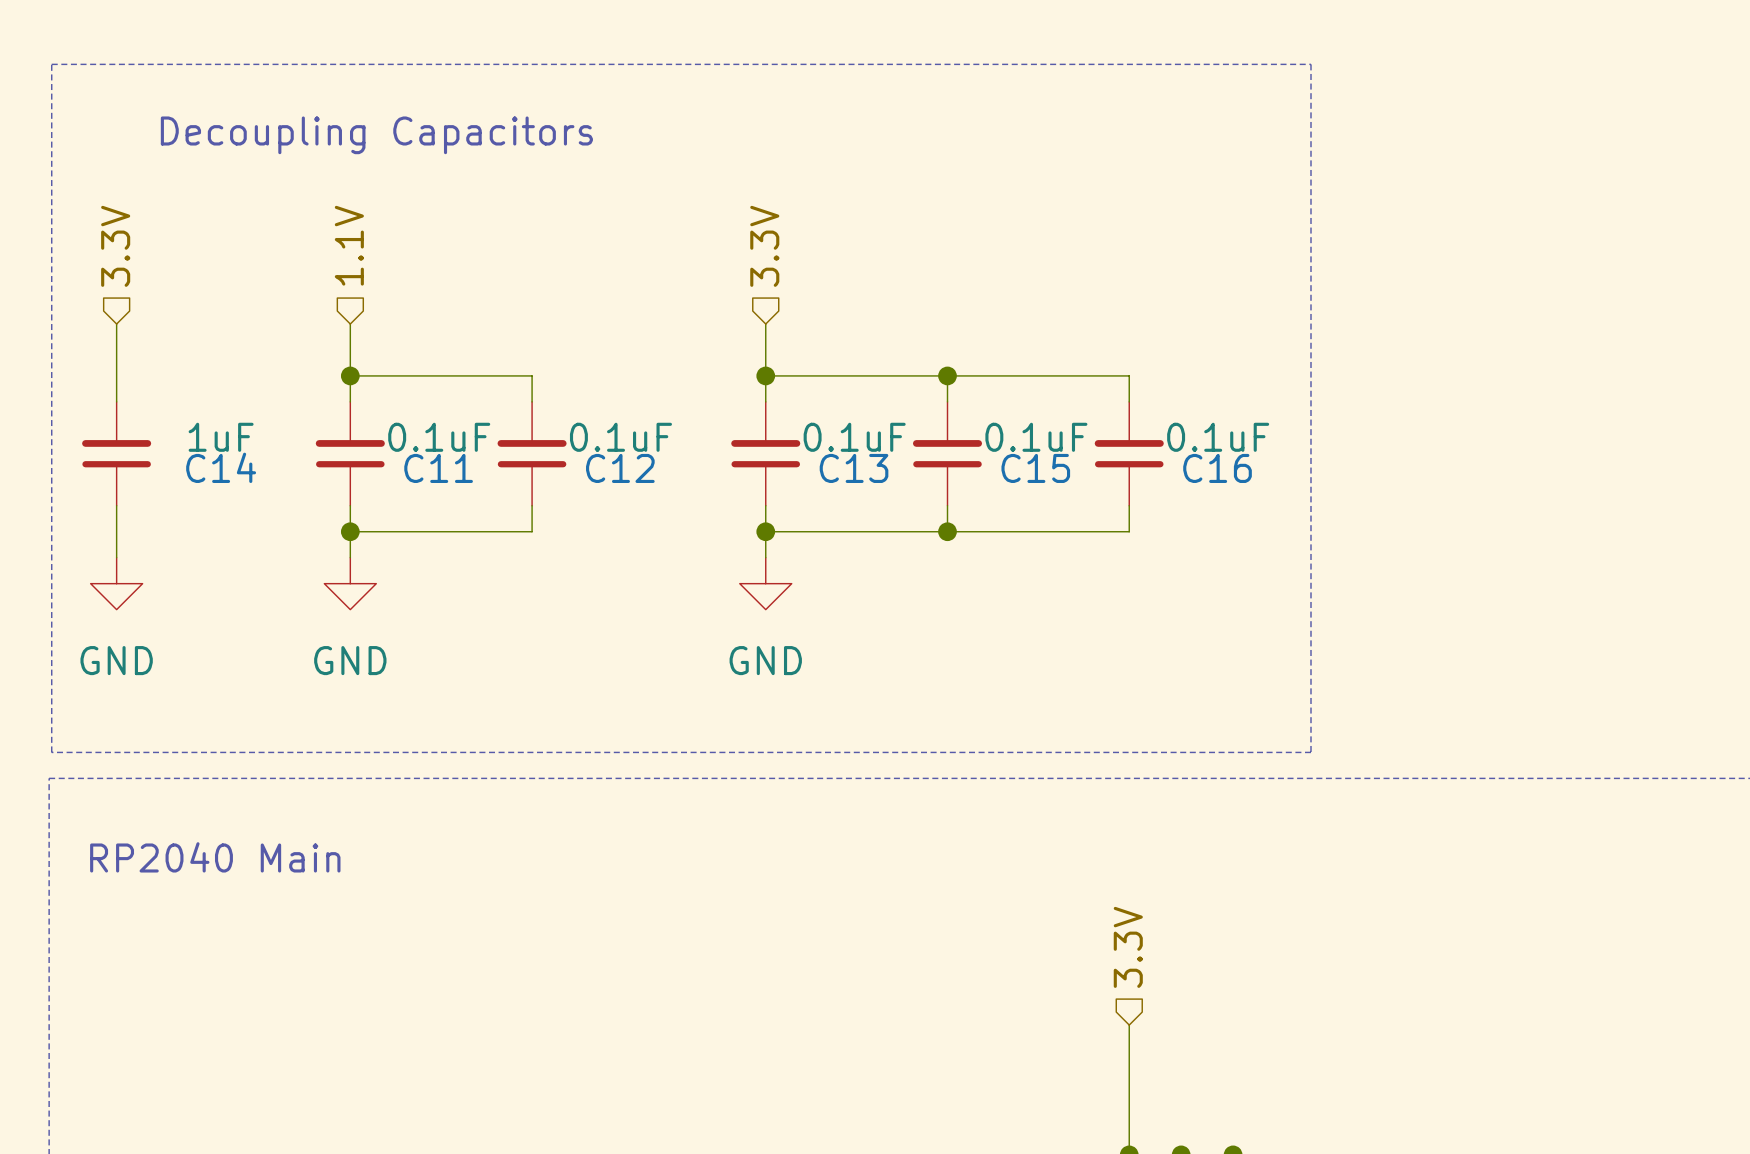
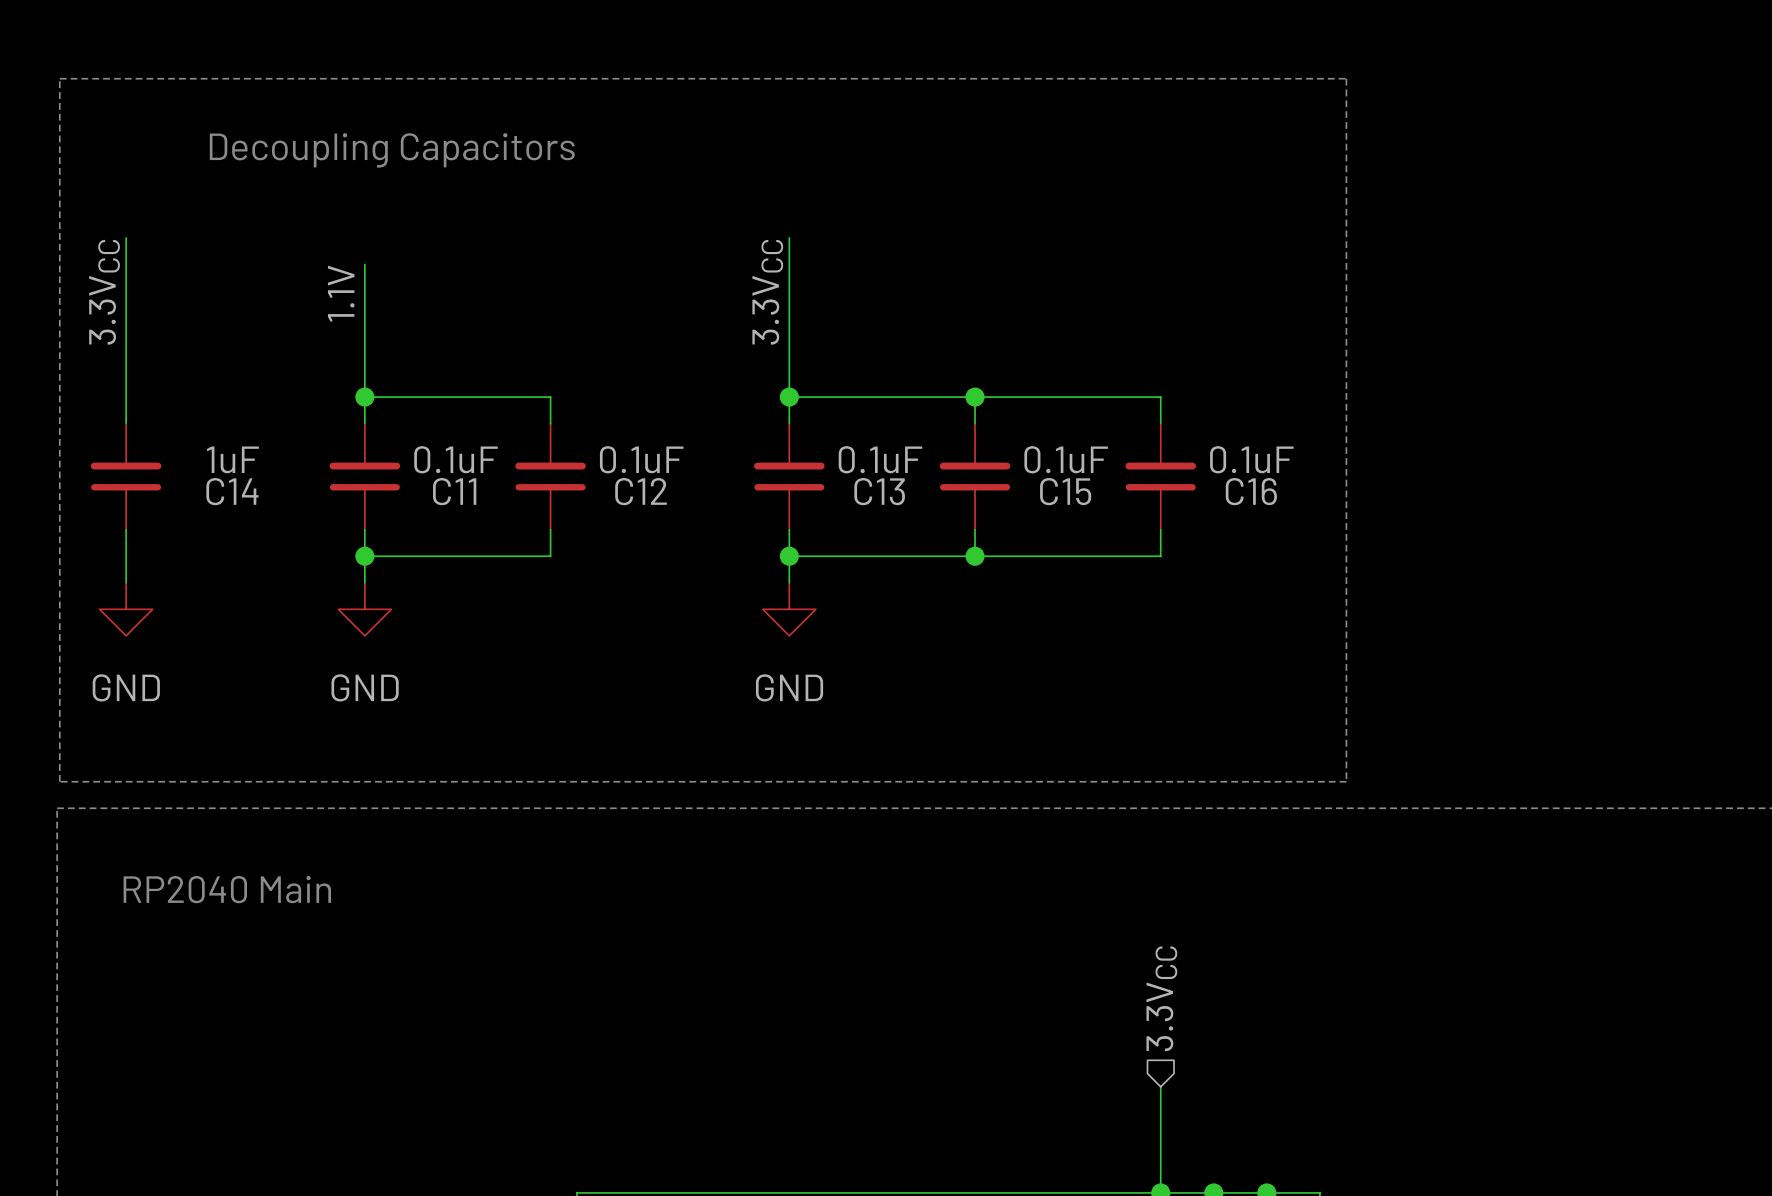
wire: none -> (126, 237) (126, 344)
wire: none -> (789, 237) (789, 344)
hierarchical label: 1.1V (349, 245) -> none
hierarchical label: 3.3V (115, 246) -> none
wire: none -> (364, 264) (364, 344)
hierarchical label: 3.3V (764, 246) -> none
label: none -> 3.3VCC (104, 292)
label: none -> 3.3VCC (767, 292)
label: none -> 1.1V (341, 293)
hierarchical label: 3.3V (1128, 947) -> 3.3VCC (1161, 998)
wire: (1129, 1025) (1129, 1051) -> none

